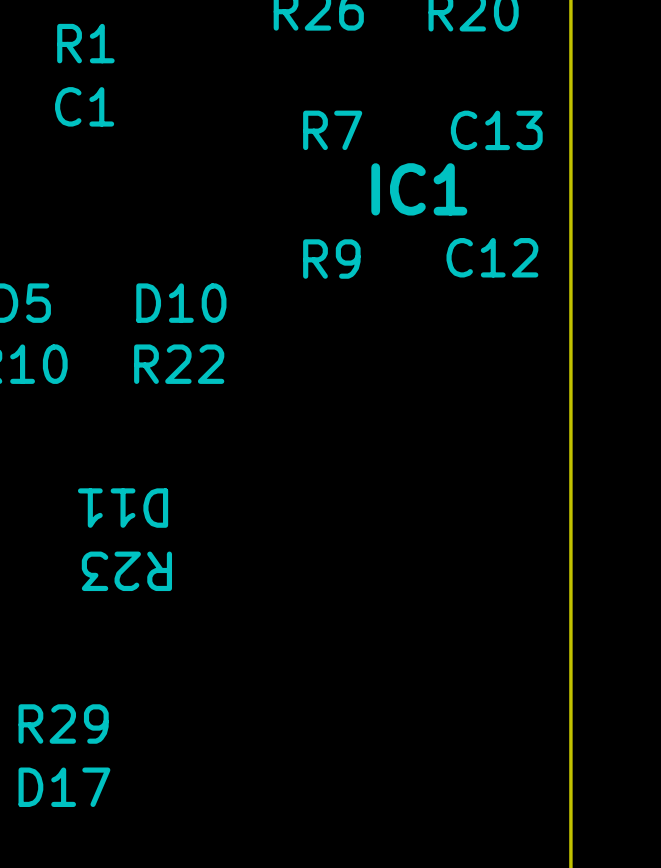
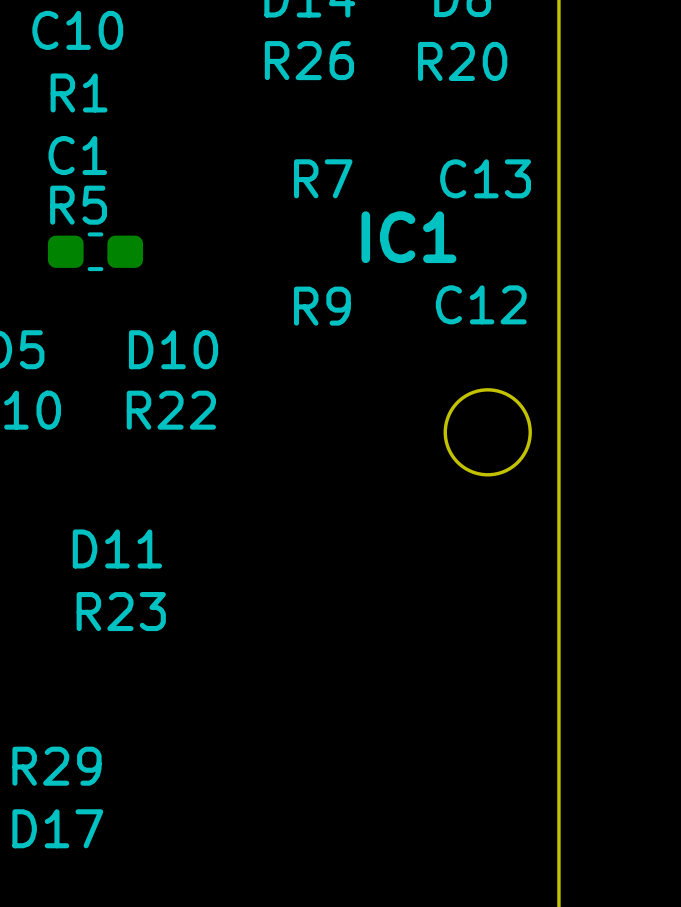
R5: none -> (95, 251)
round board edge: none -> [443, 388, 532, 477]
D11 name rotation: 0° (123, 508) -> 180° (117, 548)
R23 name rotation: 0° (126, 571) -> 180° (121, 611)

